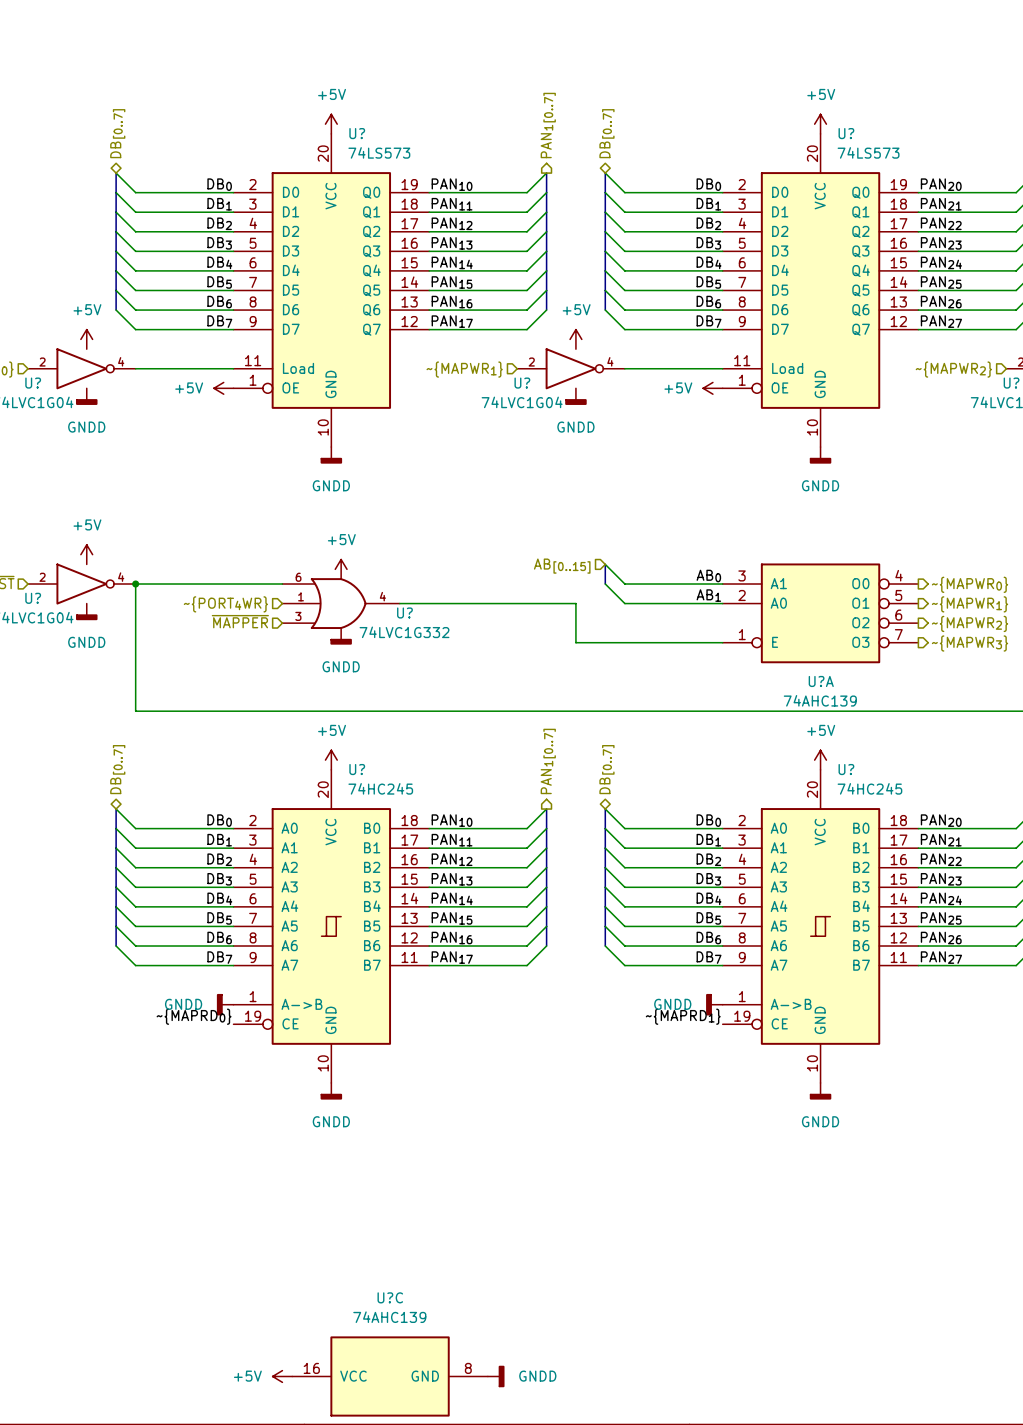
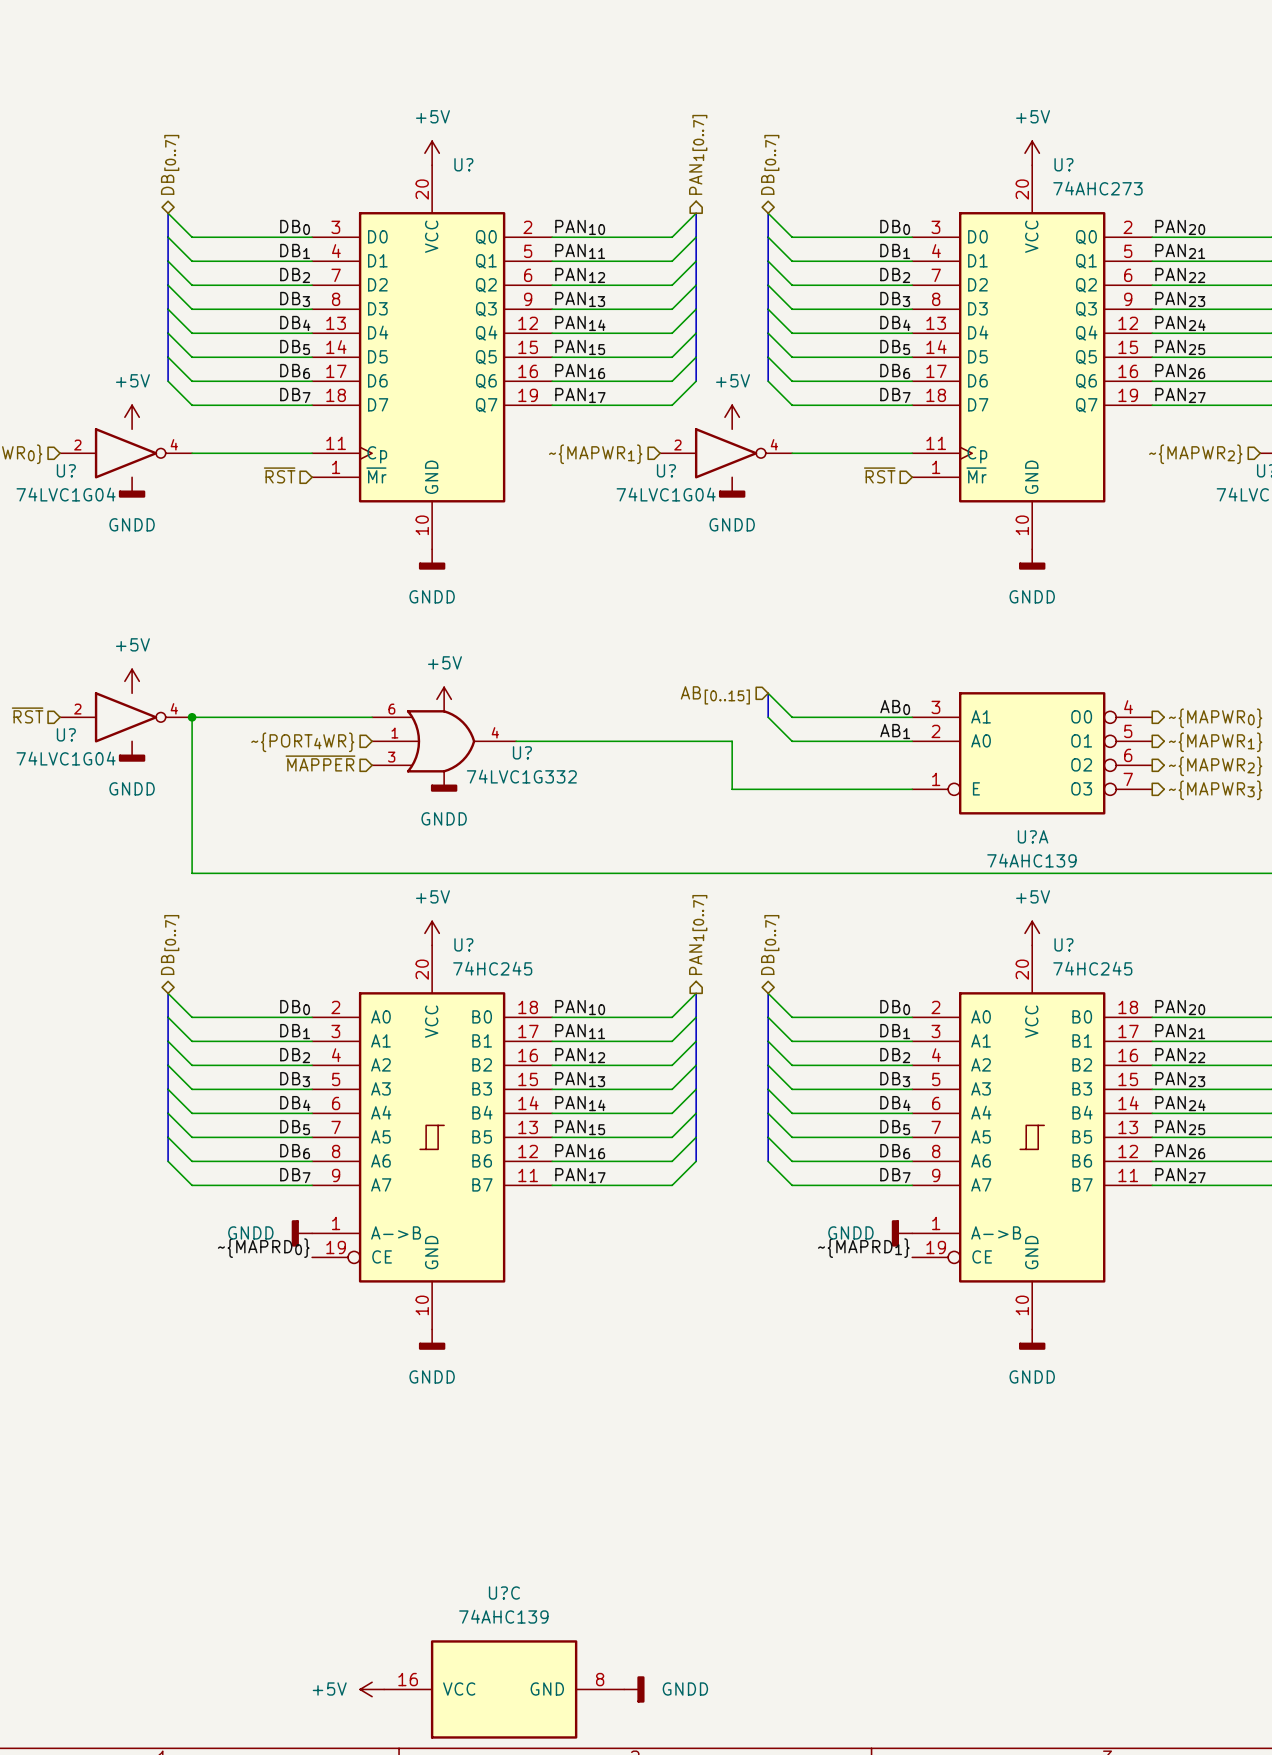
U? symbol: [233, 133, 430, 448] -> [312, 165, 553, 550]
U? symbol: [722, 133, 919, 448] -> [912, 165, 1153, 550]
U? value: 74LS573 (379, 152) -> none
U? value: 74LS573 (868, 152) -> 74AHC273 (1097, 188)
hierarchical label: none -> ~{RST} (279, 475)
hierarchical label: none -> ~{RST} (879, 475)
power symbol: +5V (223, 388) -> none
power symbol: +5V (712, 388) -> none

